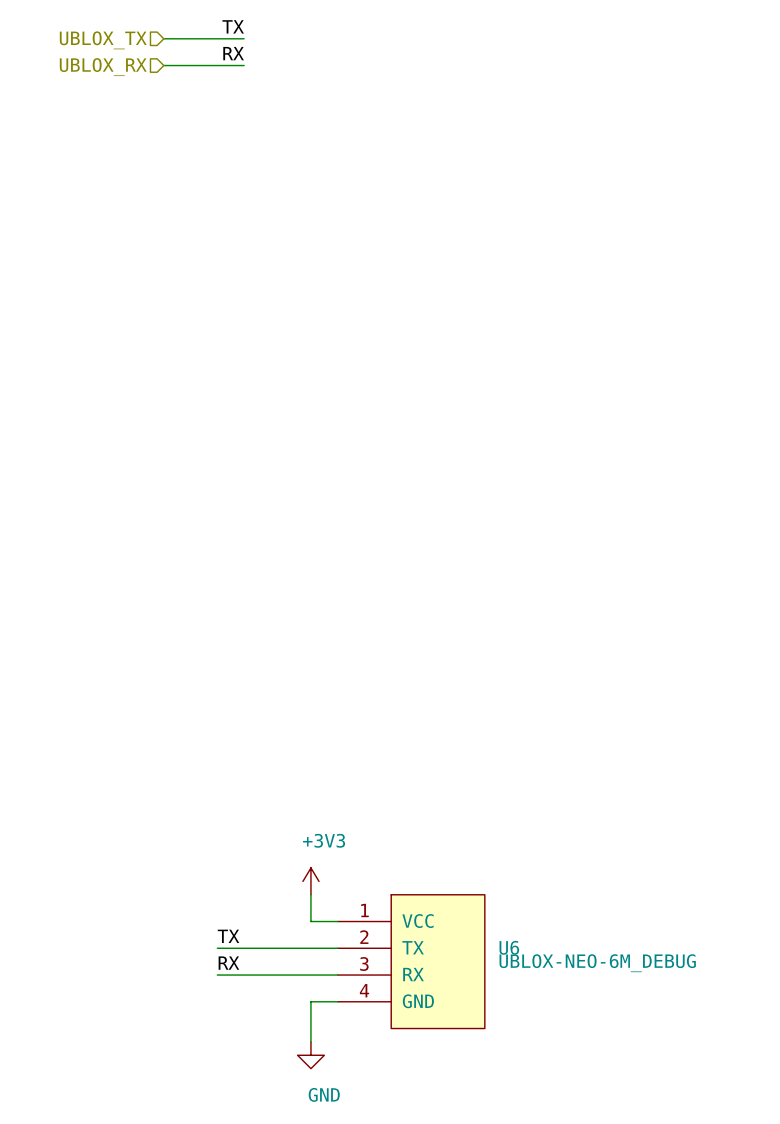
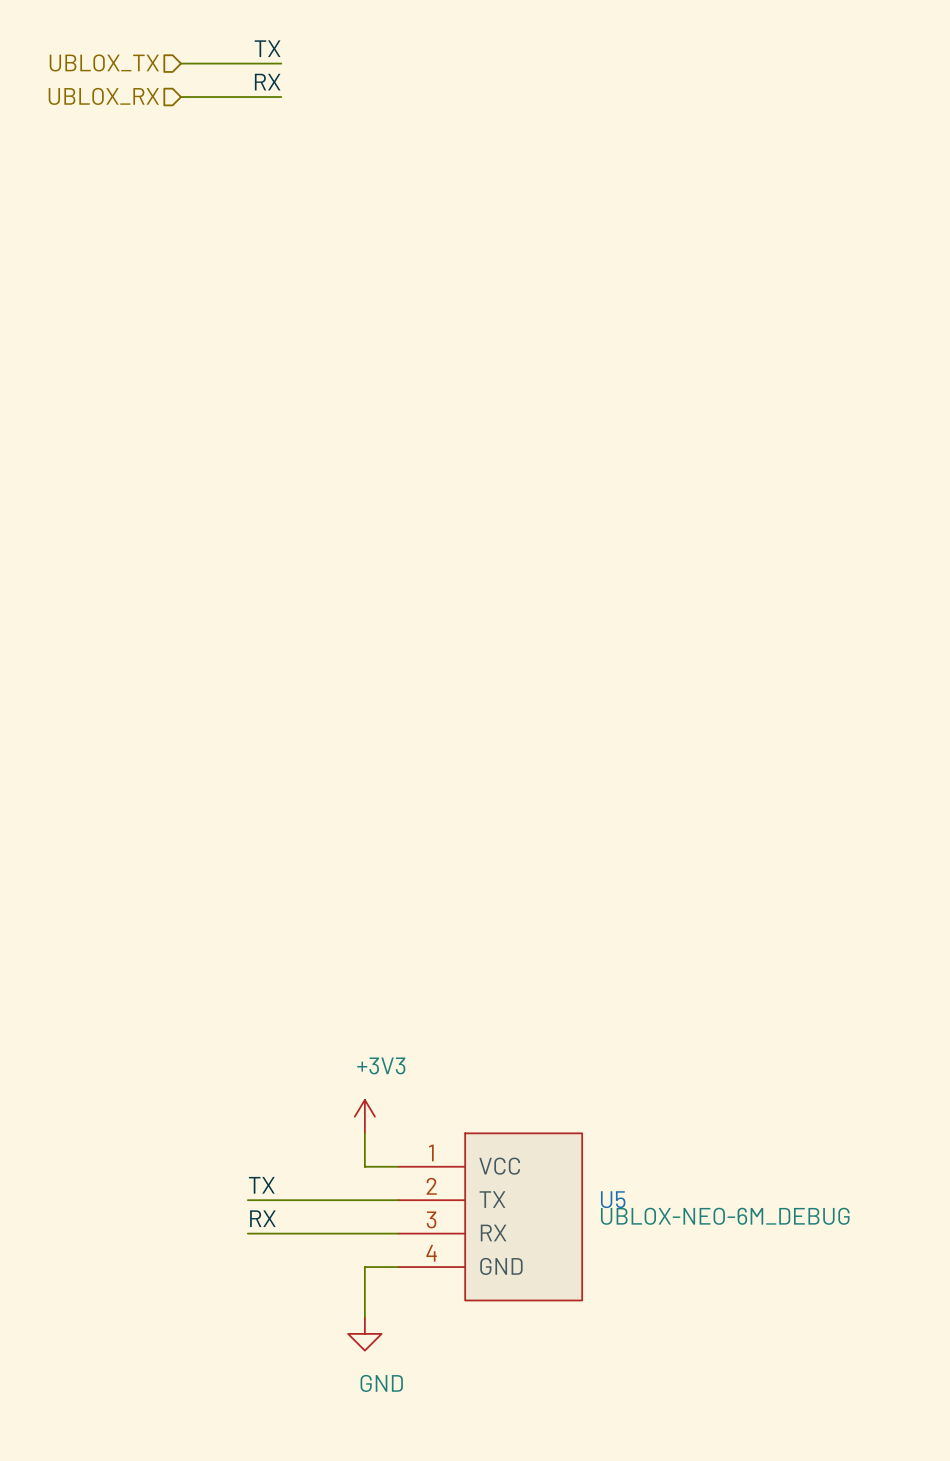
U6 name: U6 (509, 947) -> U5 (613, 1199)

